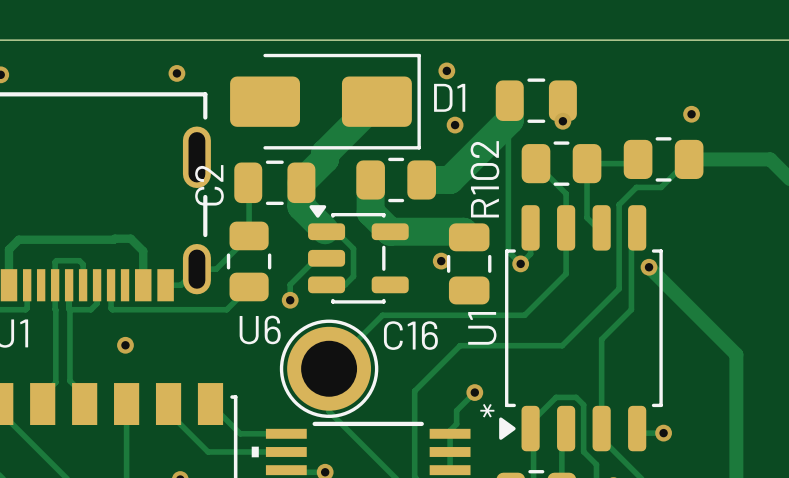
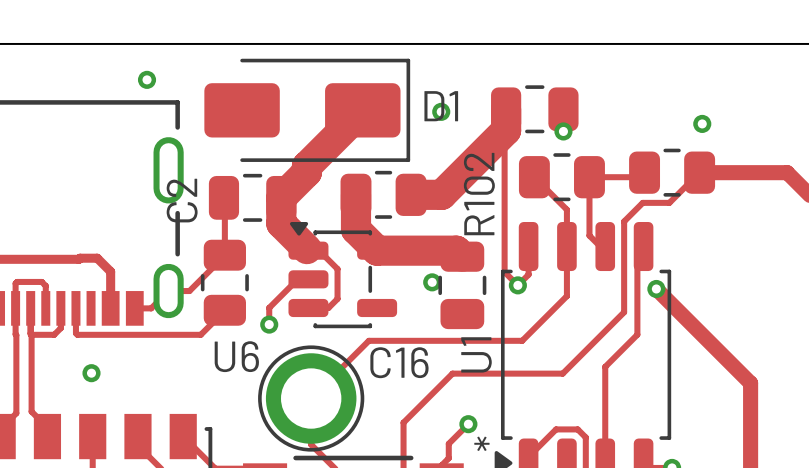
via: (446, 70) -> none
via: none -> (441, 111)
via: (455, 125) -> none

